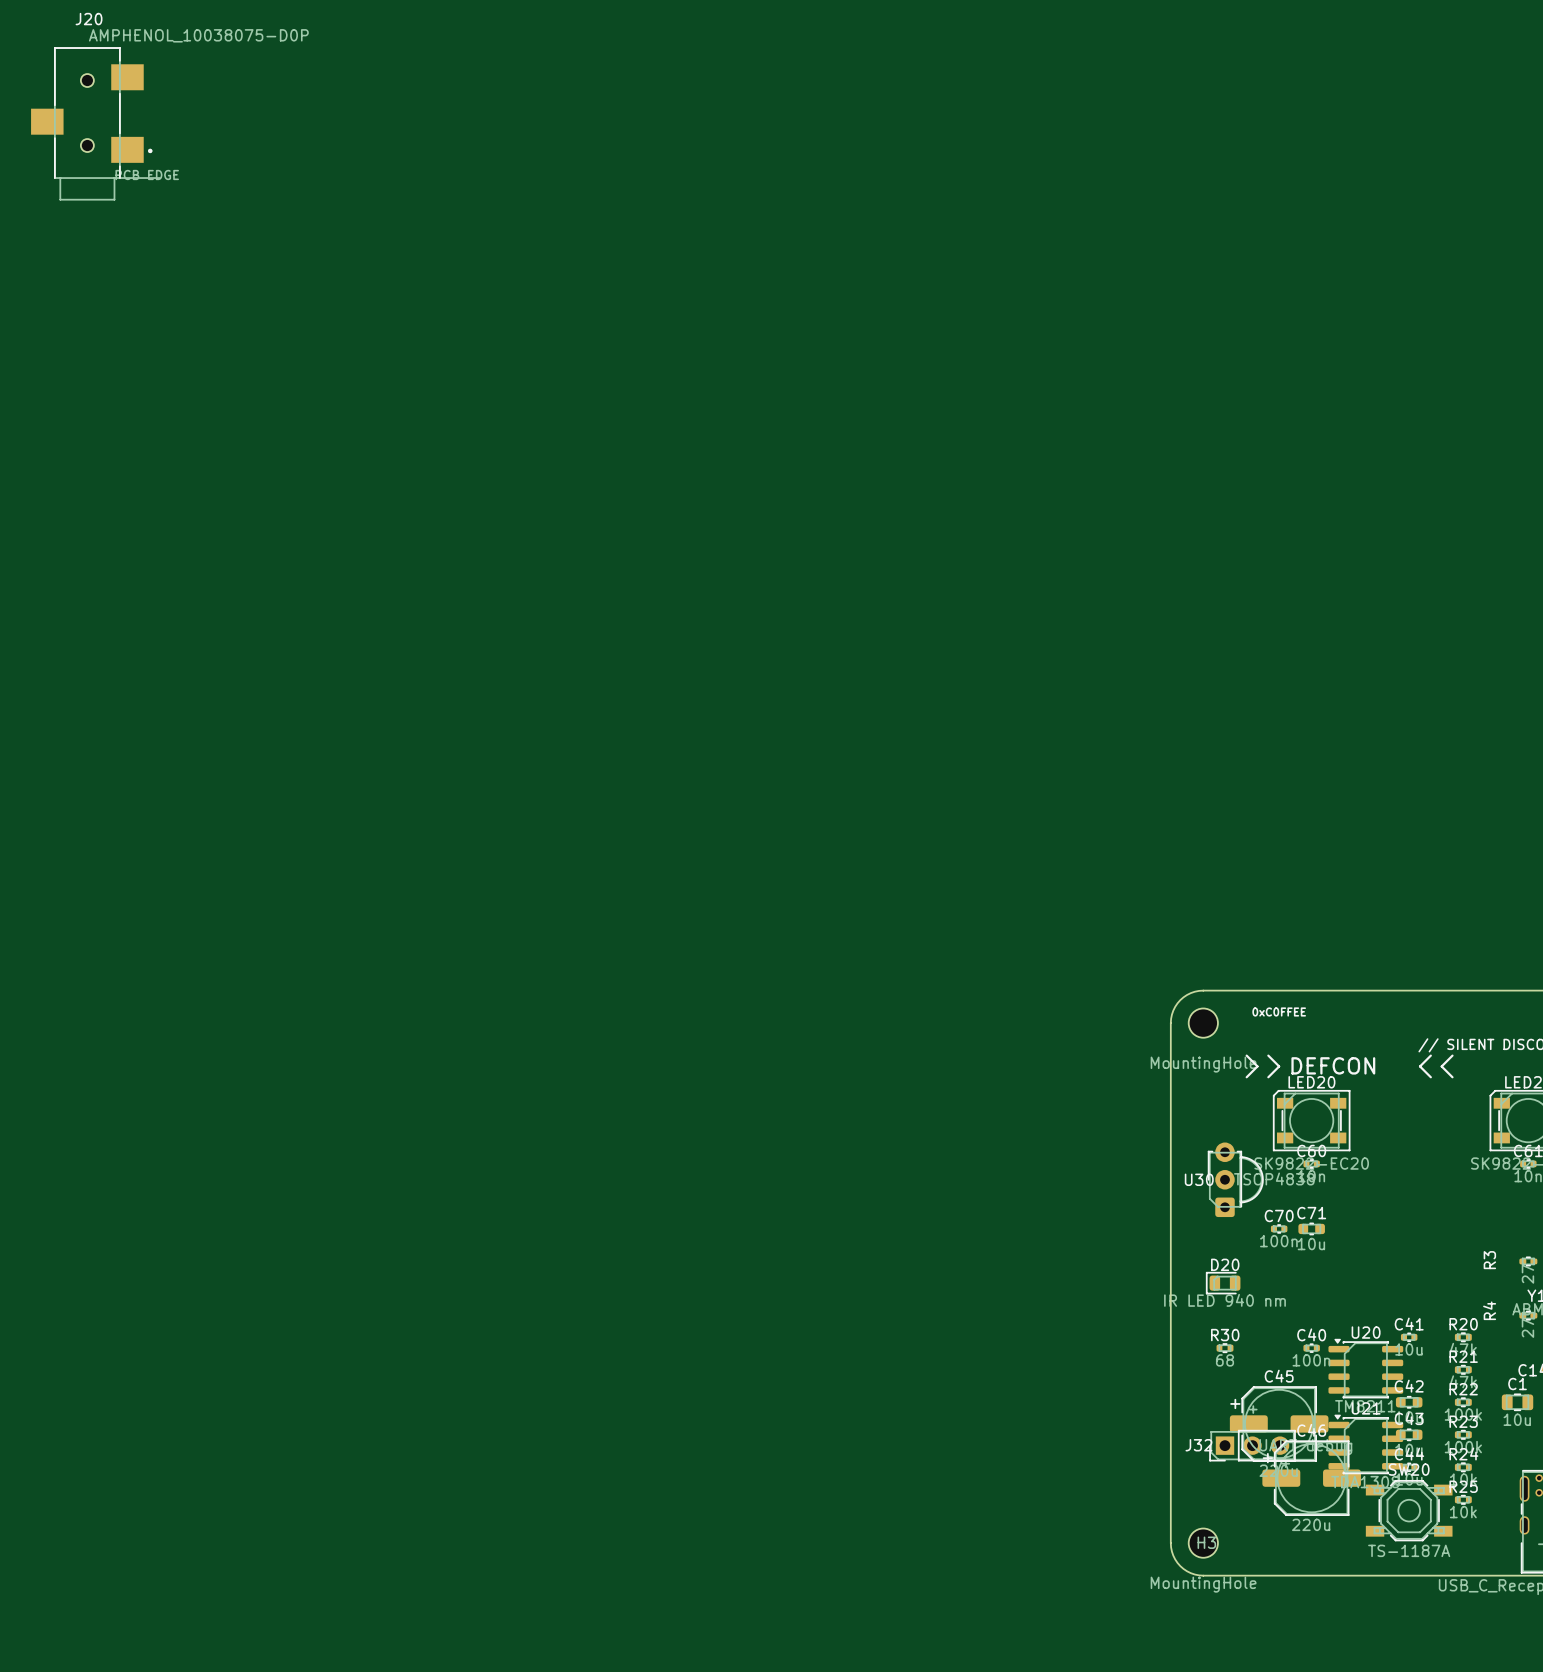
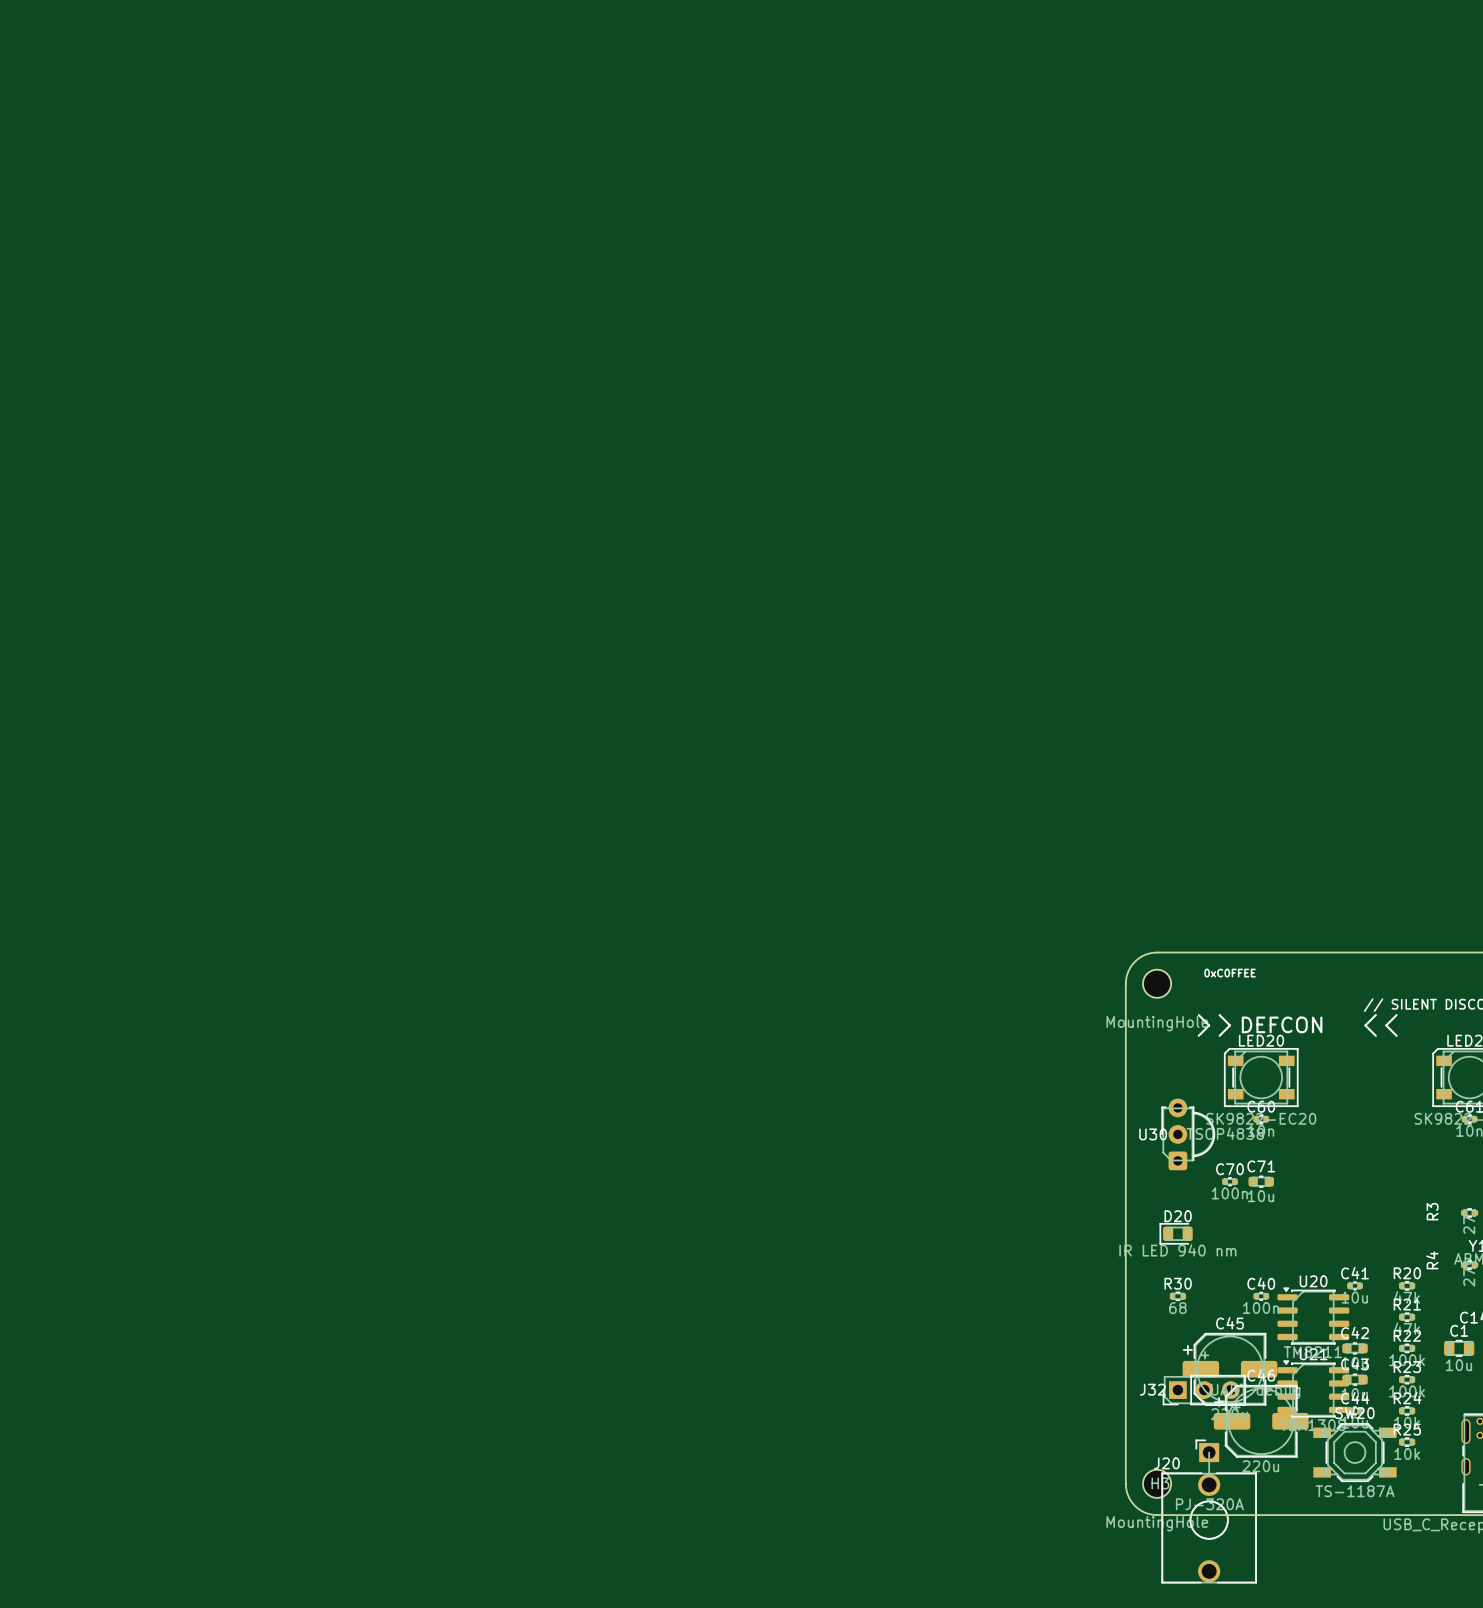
J20 name position: J20 (89, 19) -> J20 (1166, 1463)
J20 value: AMPHENOL_10038075-D0P (198, 35) -> PJ-320A (1209, 1504)
J20 footprint: [31, 47, 161, 201] -> [1161, 1439, 1257, 1584]

